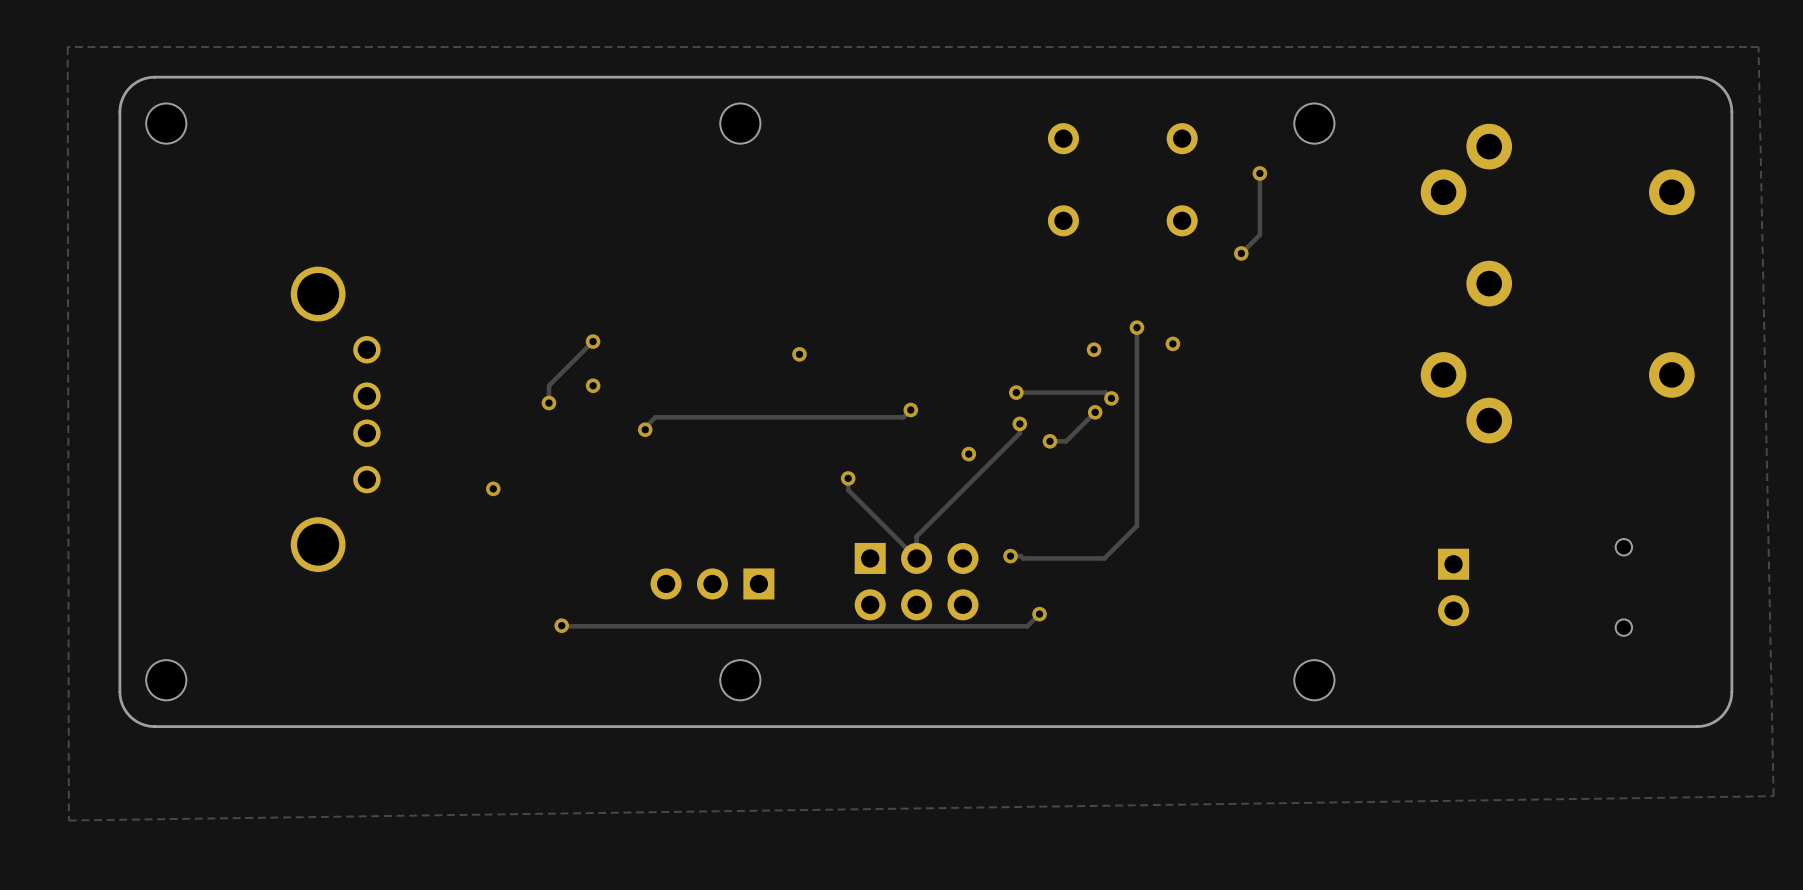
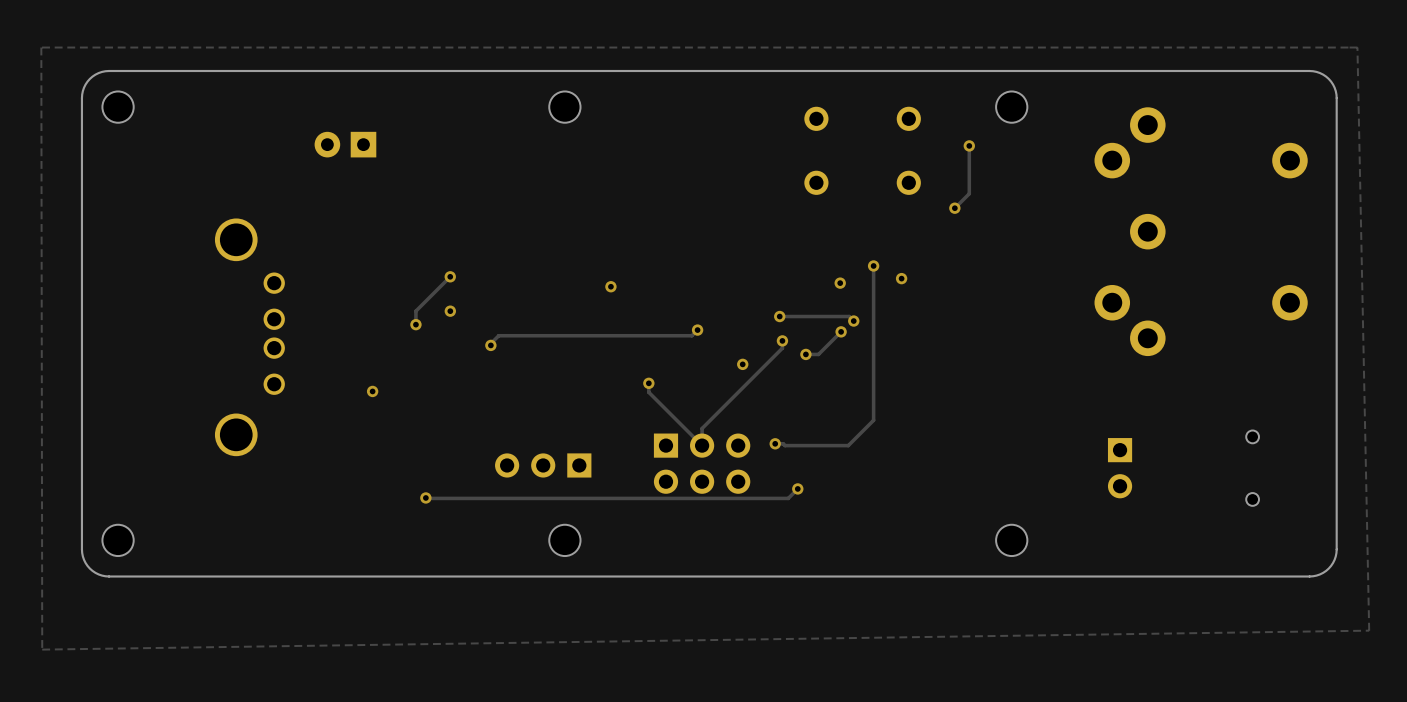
part: none -> (345, 144)

